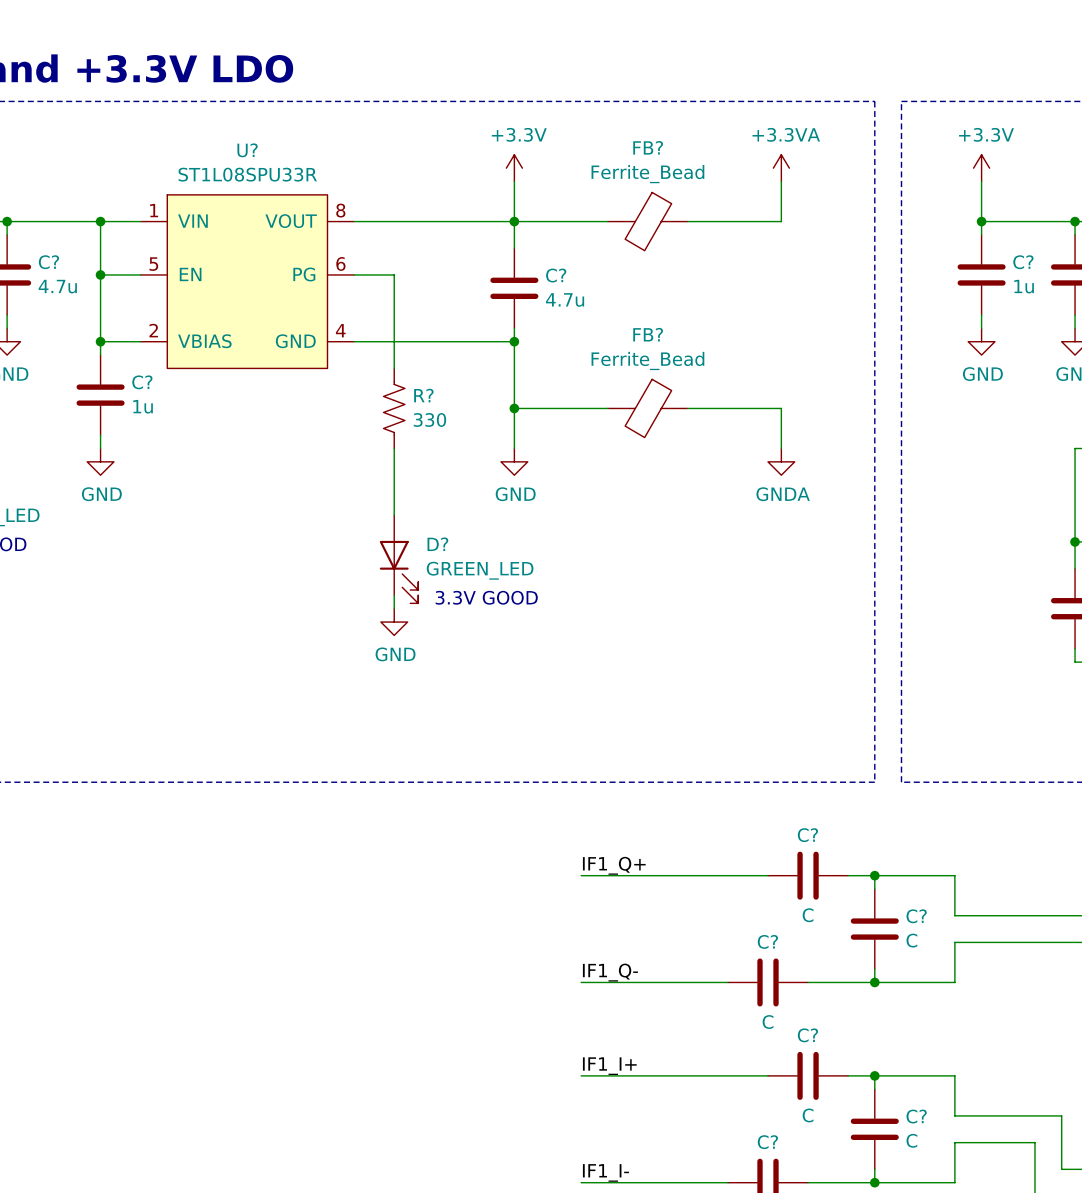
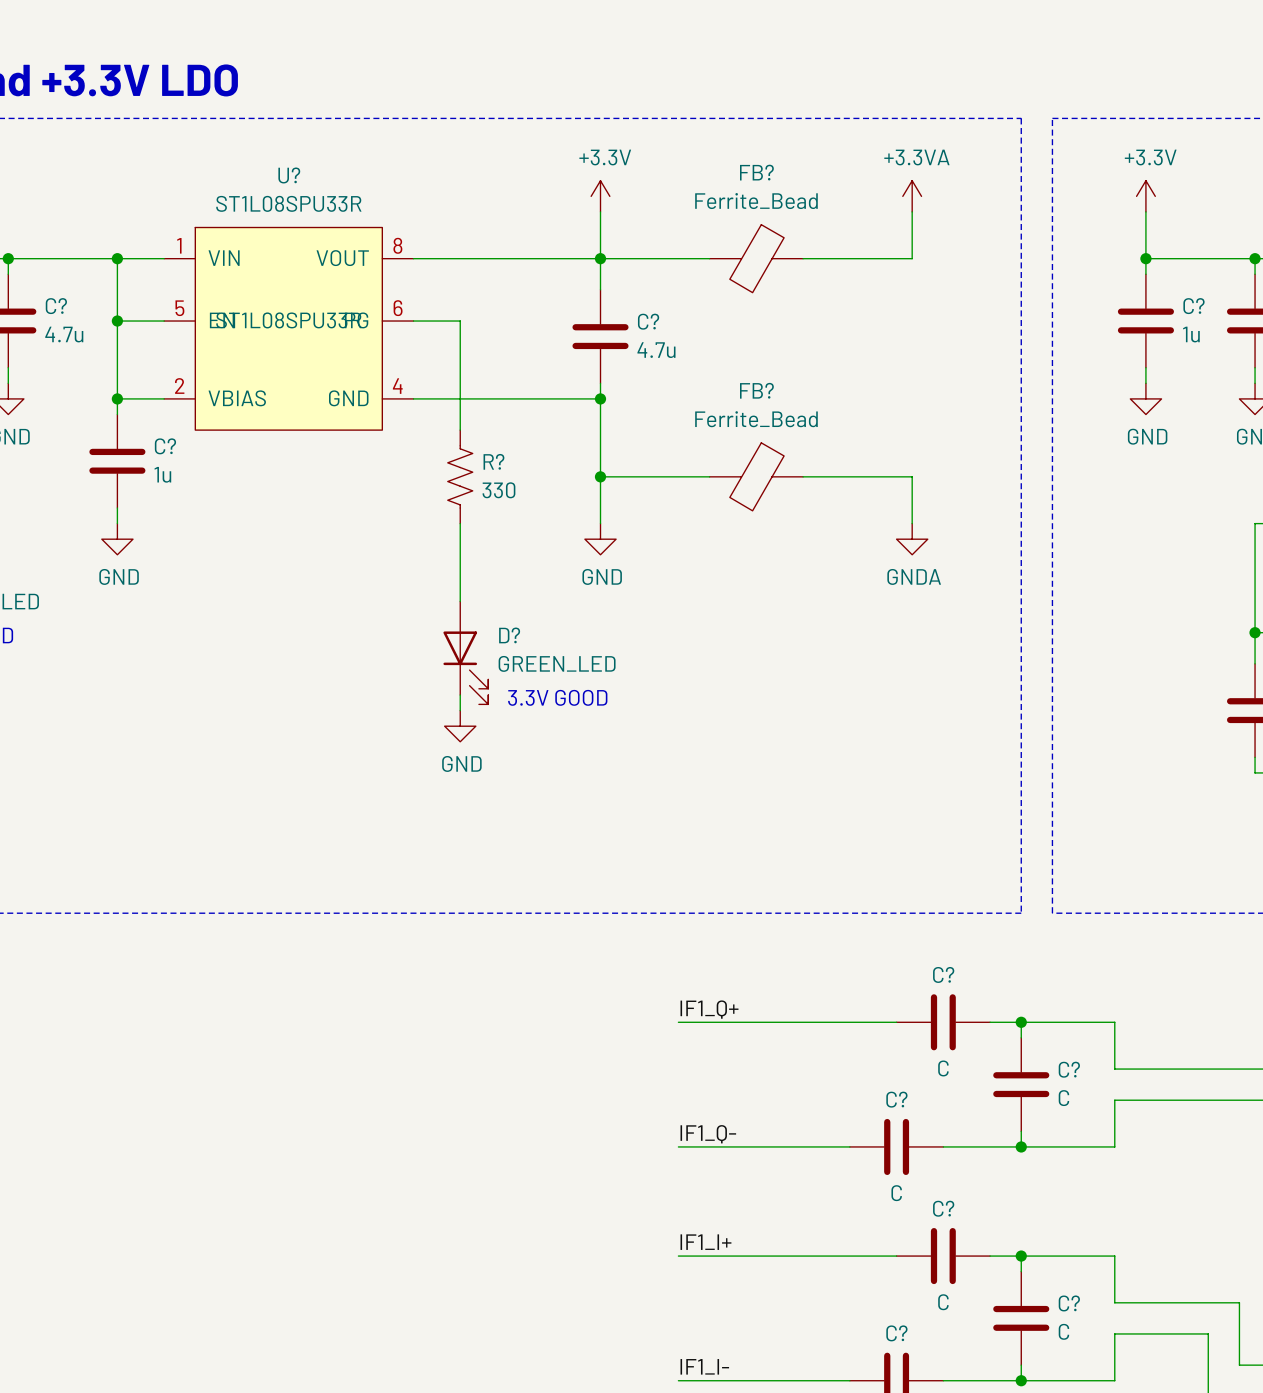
U? text: none -> ST1L08SPU33R (288, 320)

